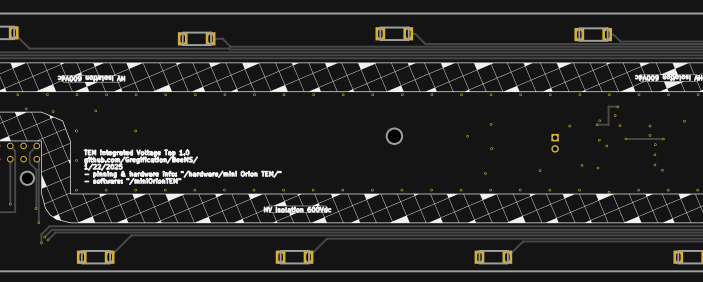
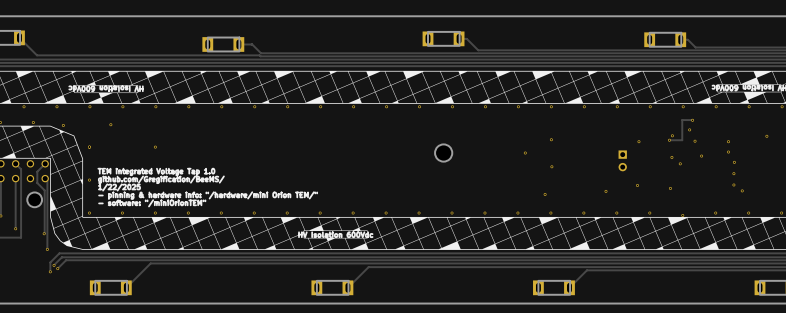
track: (663, 138) (625, 138) -> none
via: (663, 138) -> none
via position: (582, 165) -> (637, 185)

